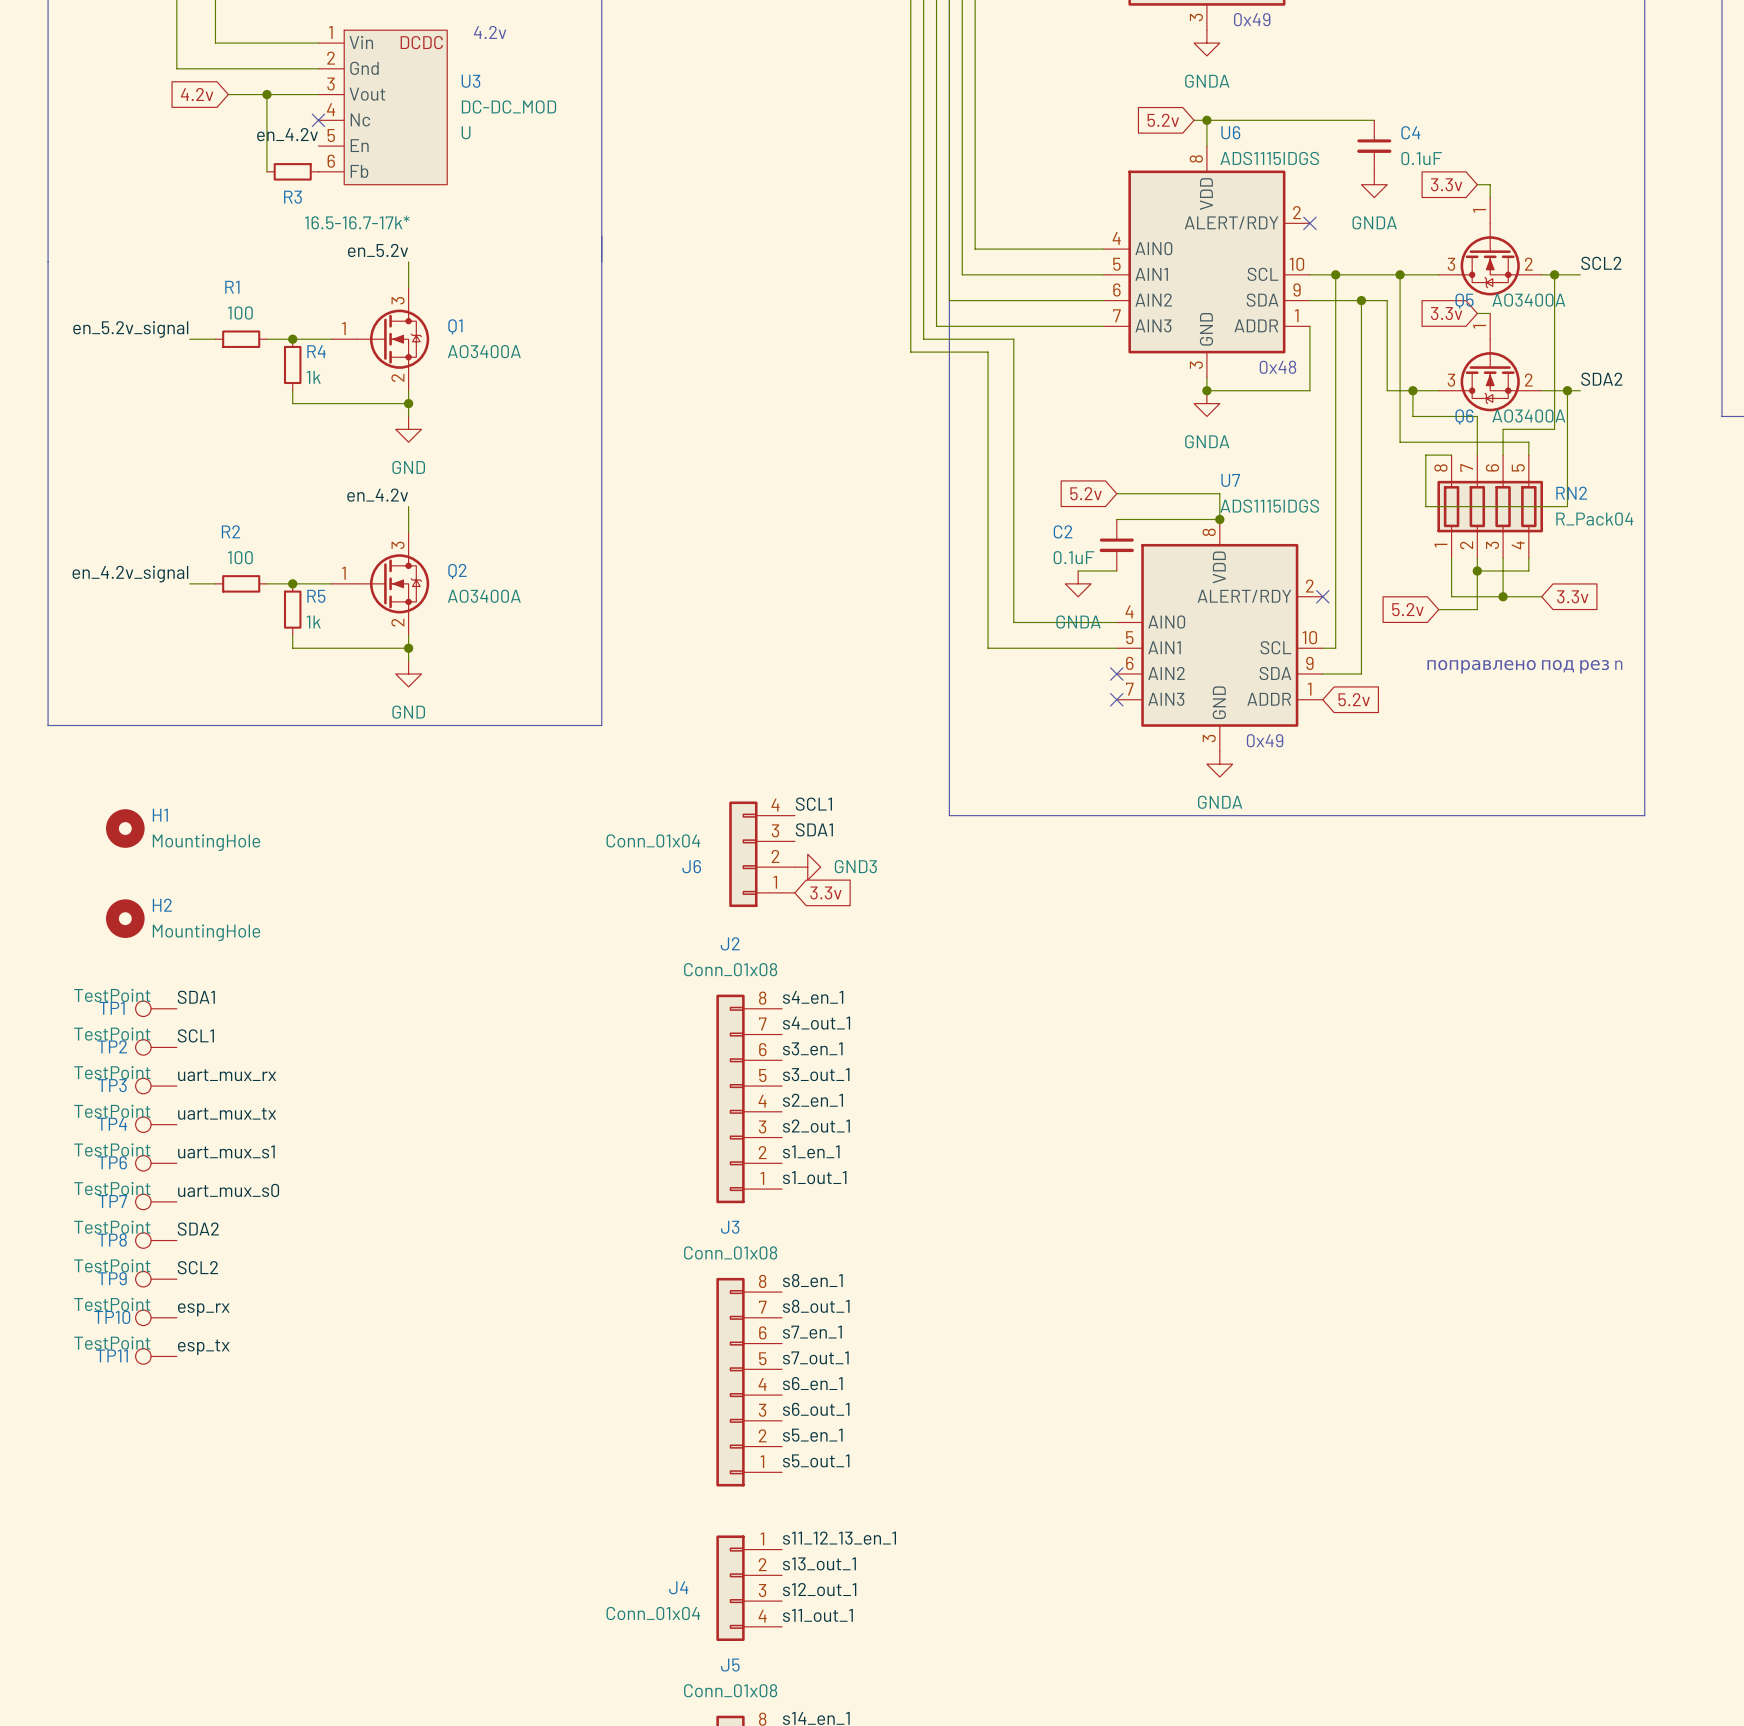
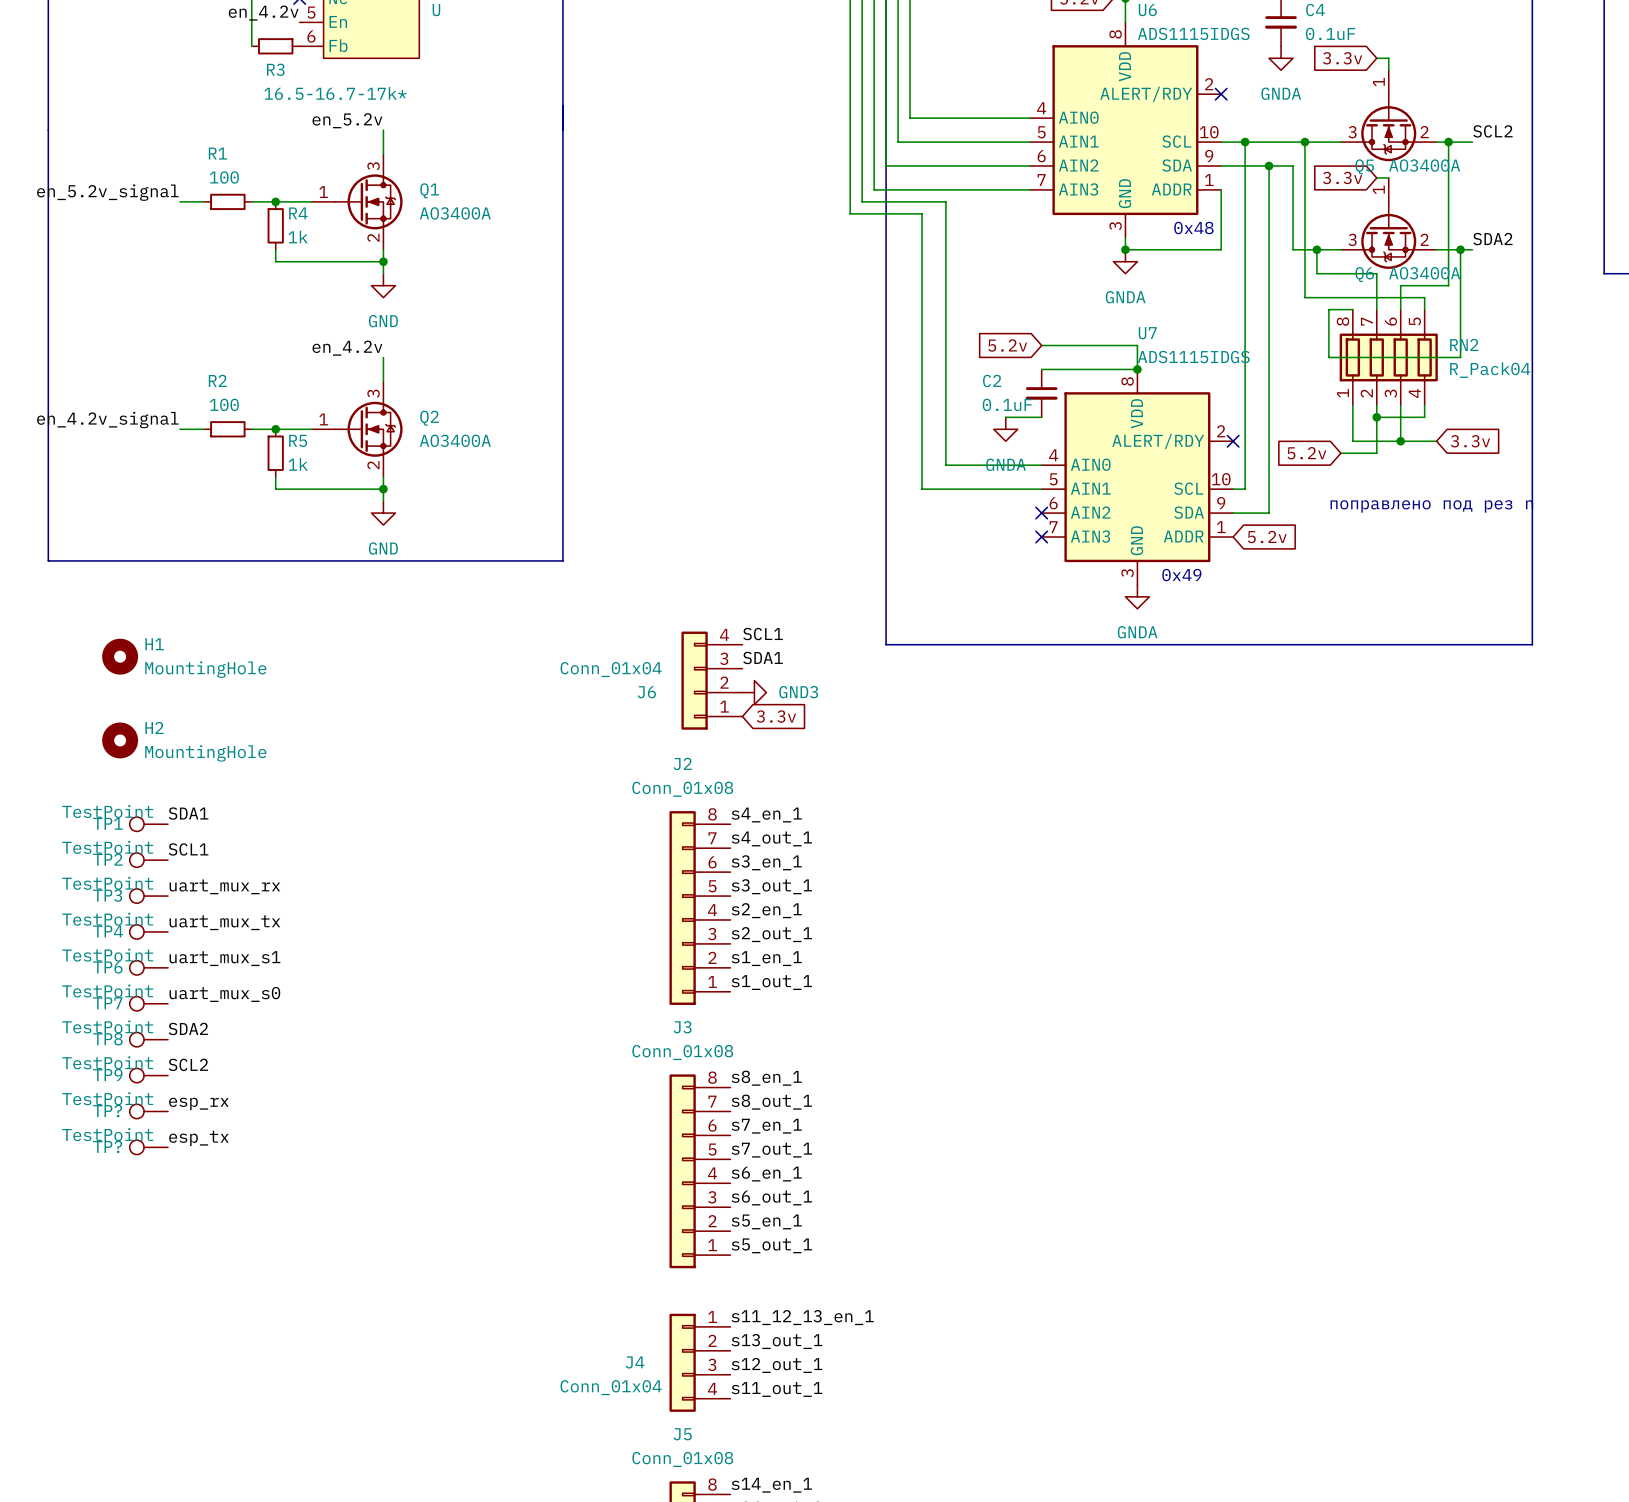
TP10 name: TP10 (112, 1317) -> TP? (107, 1111)
TP11 name: TP11 (111, 1355) -> TP? (107, 1146)

